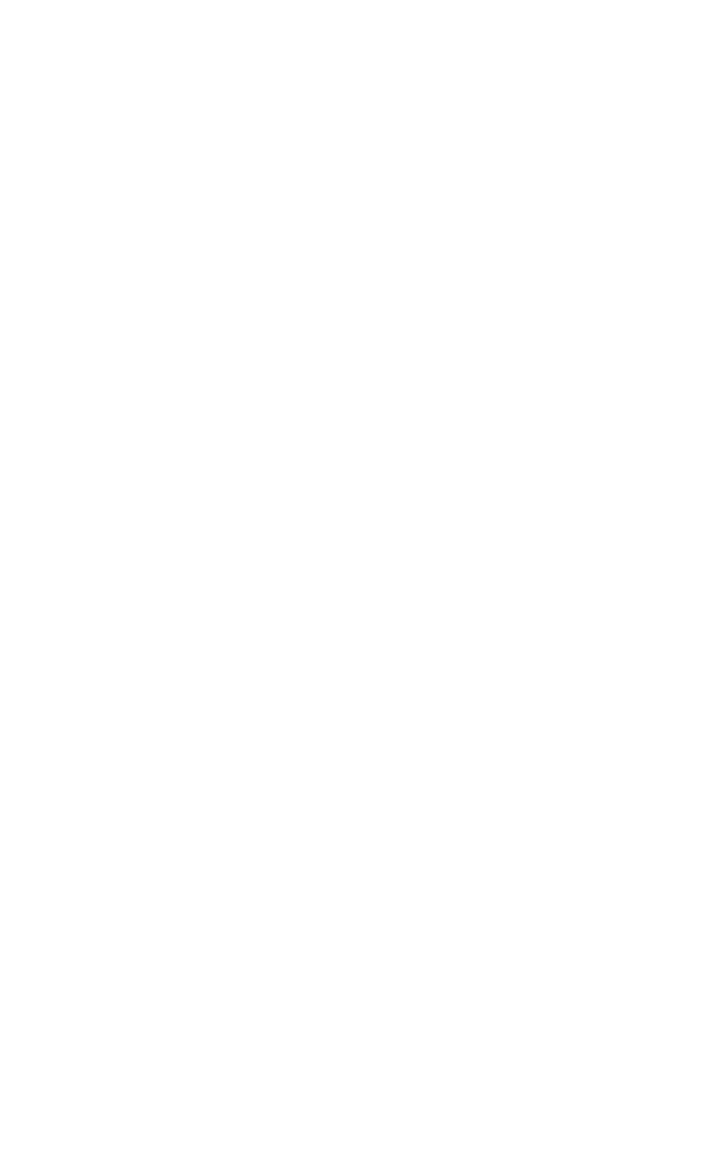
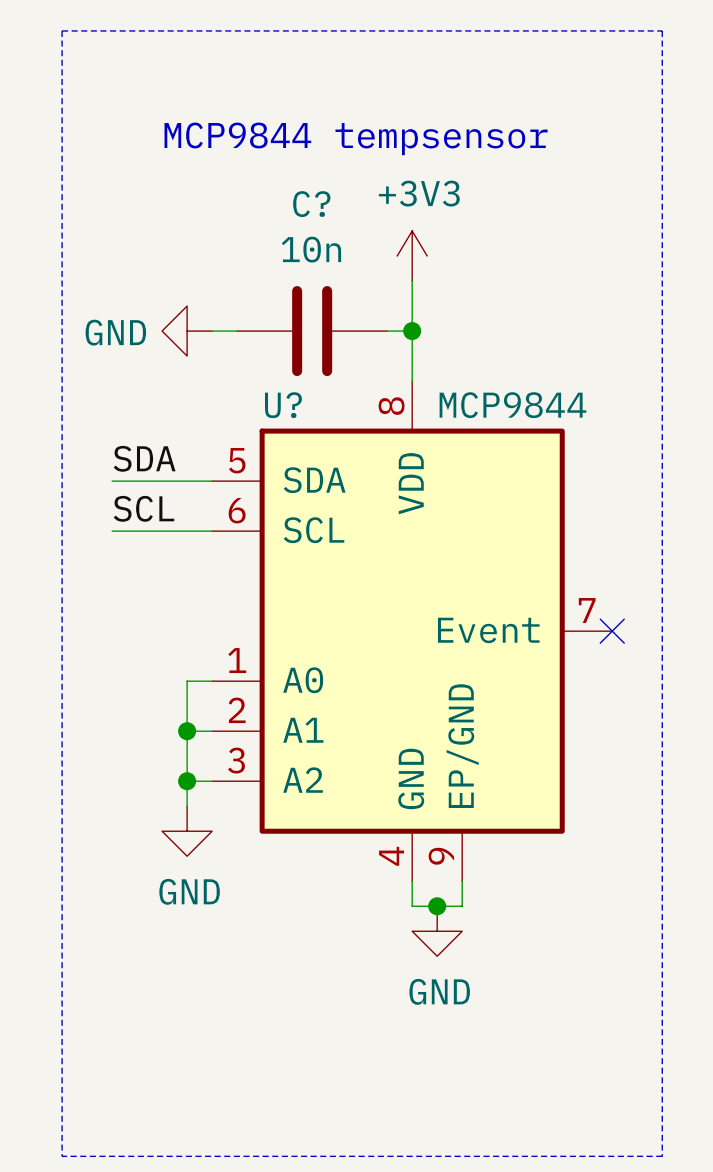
line: none -> (62, 30) (662, 30) (662, 1156) (62, 1156) (62, 30)
text: none -> MCP9844 tempsensor (356, 138)
power symbol: none -> +3V3 (412, 256)
wire: none -> (412, 281) (412, 381)
power symbol: none -> GND (187, 331)
wire: none -> (212, 331) (237, 331)
C?: none -> 10n (312, 331)
wire: none -> (387, 331) (412, 331)
junction: none -> (412, 331)
label: none -> SDA (144, 458)
wire: none -> (112, 481) (212, 481)
label: none -> SCL (143, 508)
wire: none -> (112, 531) (212, 531)
U?: none -> MCP9844 (412, 631)
no-connect mark: none -> (612, 631)
wire: none -> (212, 681) (187, 681) (187, 806)
wire: none -> (187, 731) (212, 731)
junction: none -> (187, 731)
wire: none -> (187, 781) (212, 781)
junction: none -> (187, 781)
power symbol: none -> GND (187, 831)
wire: none -> (412, 881) (412, 906) (462, 906) (462, 881)
junction: none -> (437, 906)
power symbol: none -> GND (437, 931)

